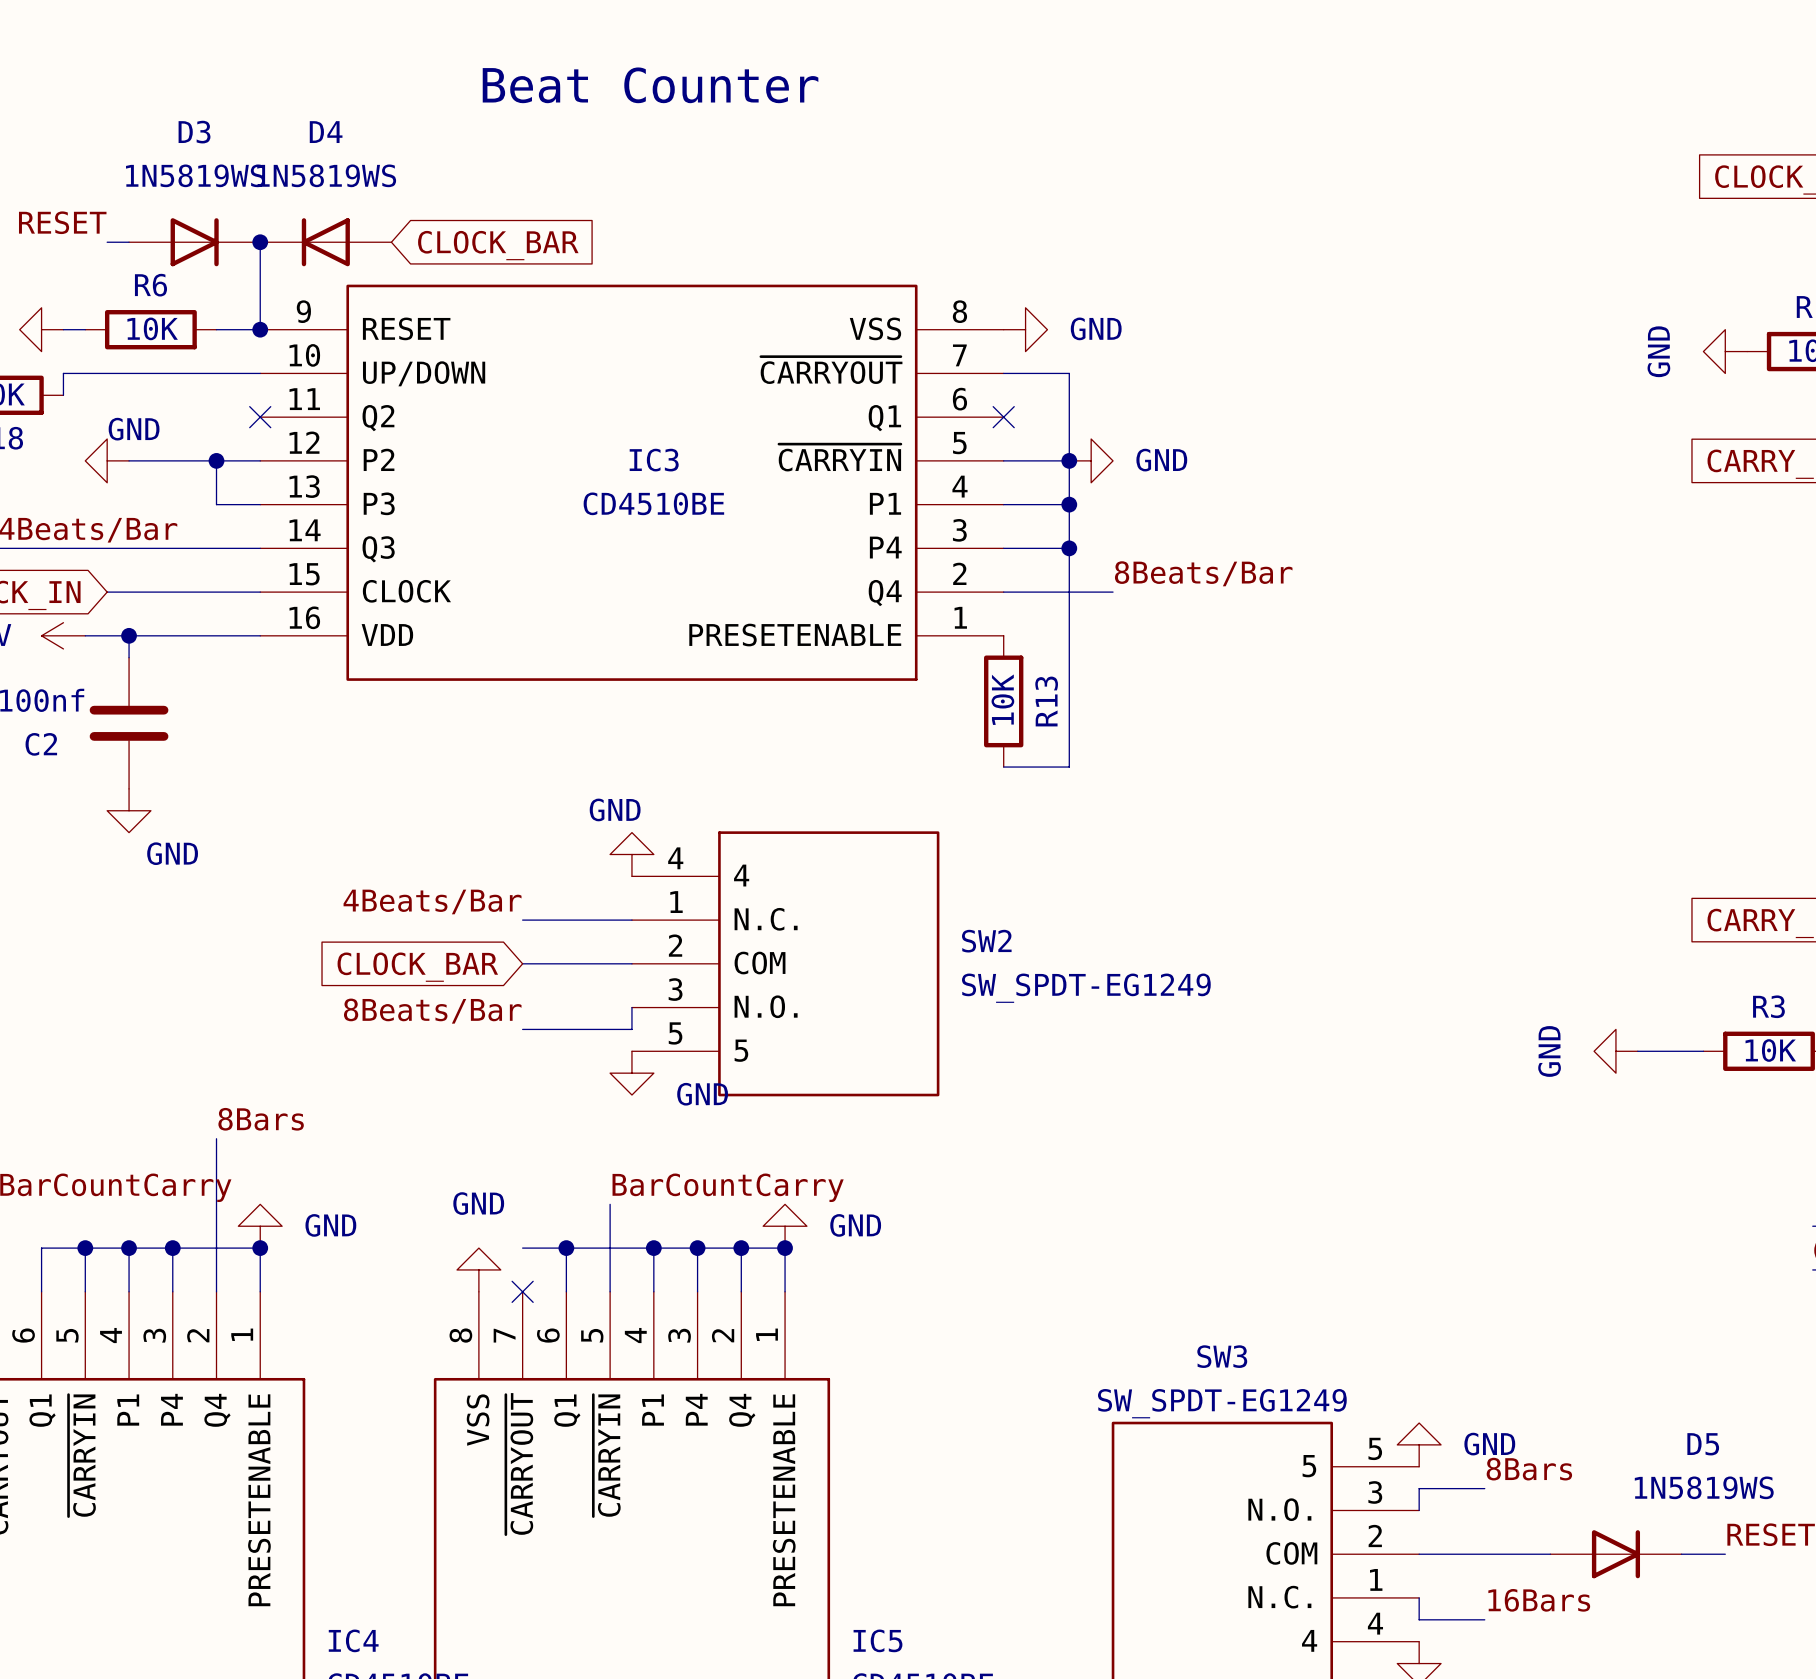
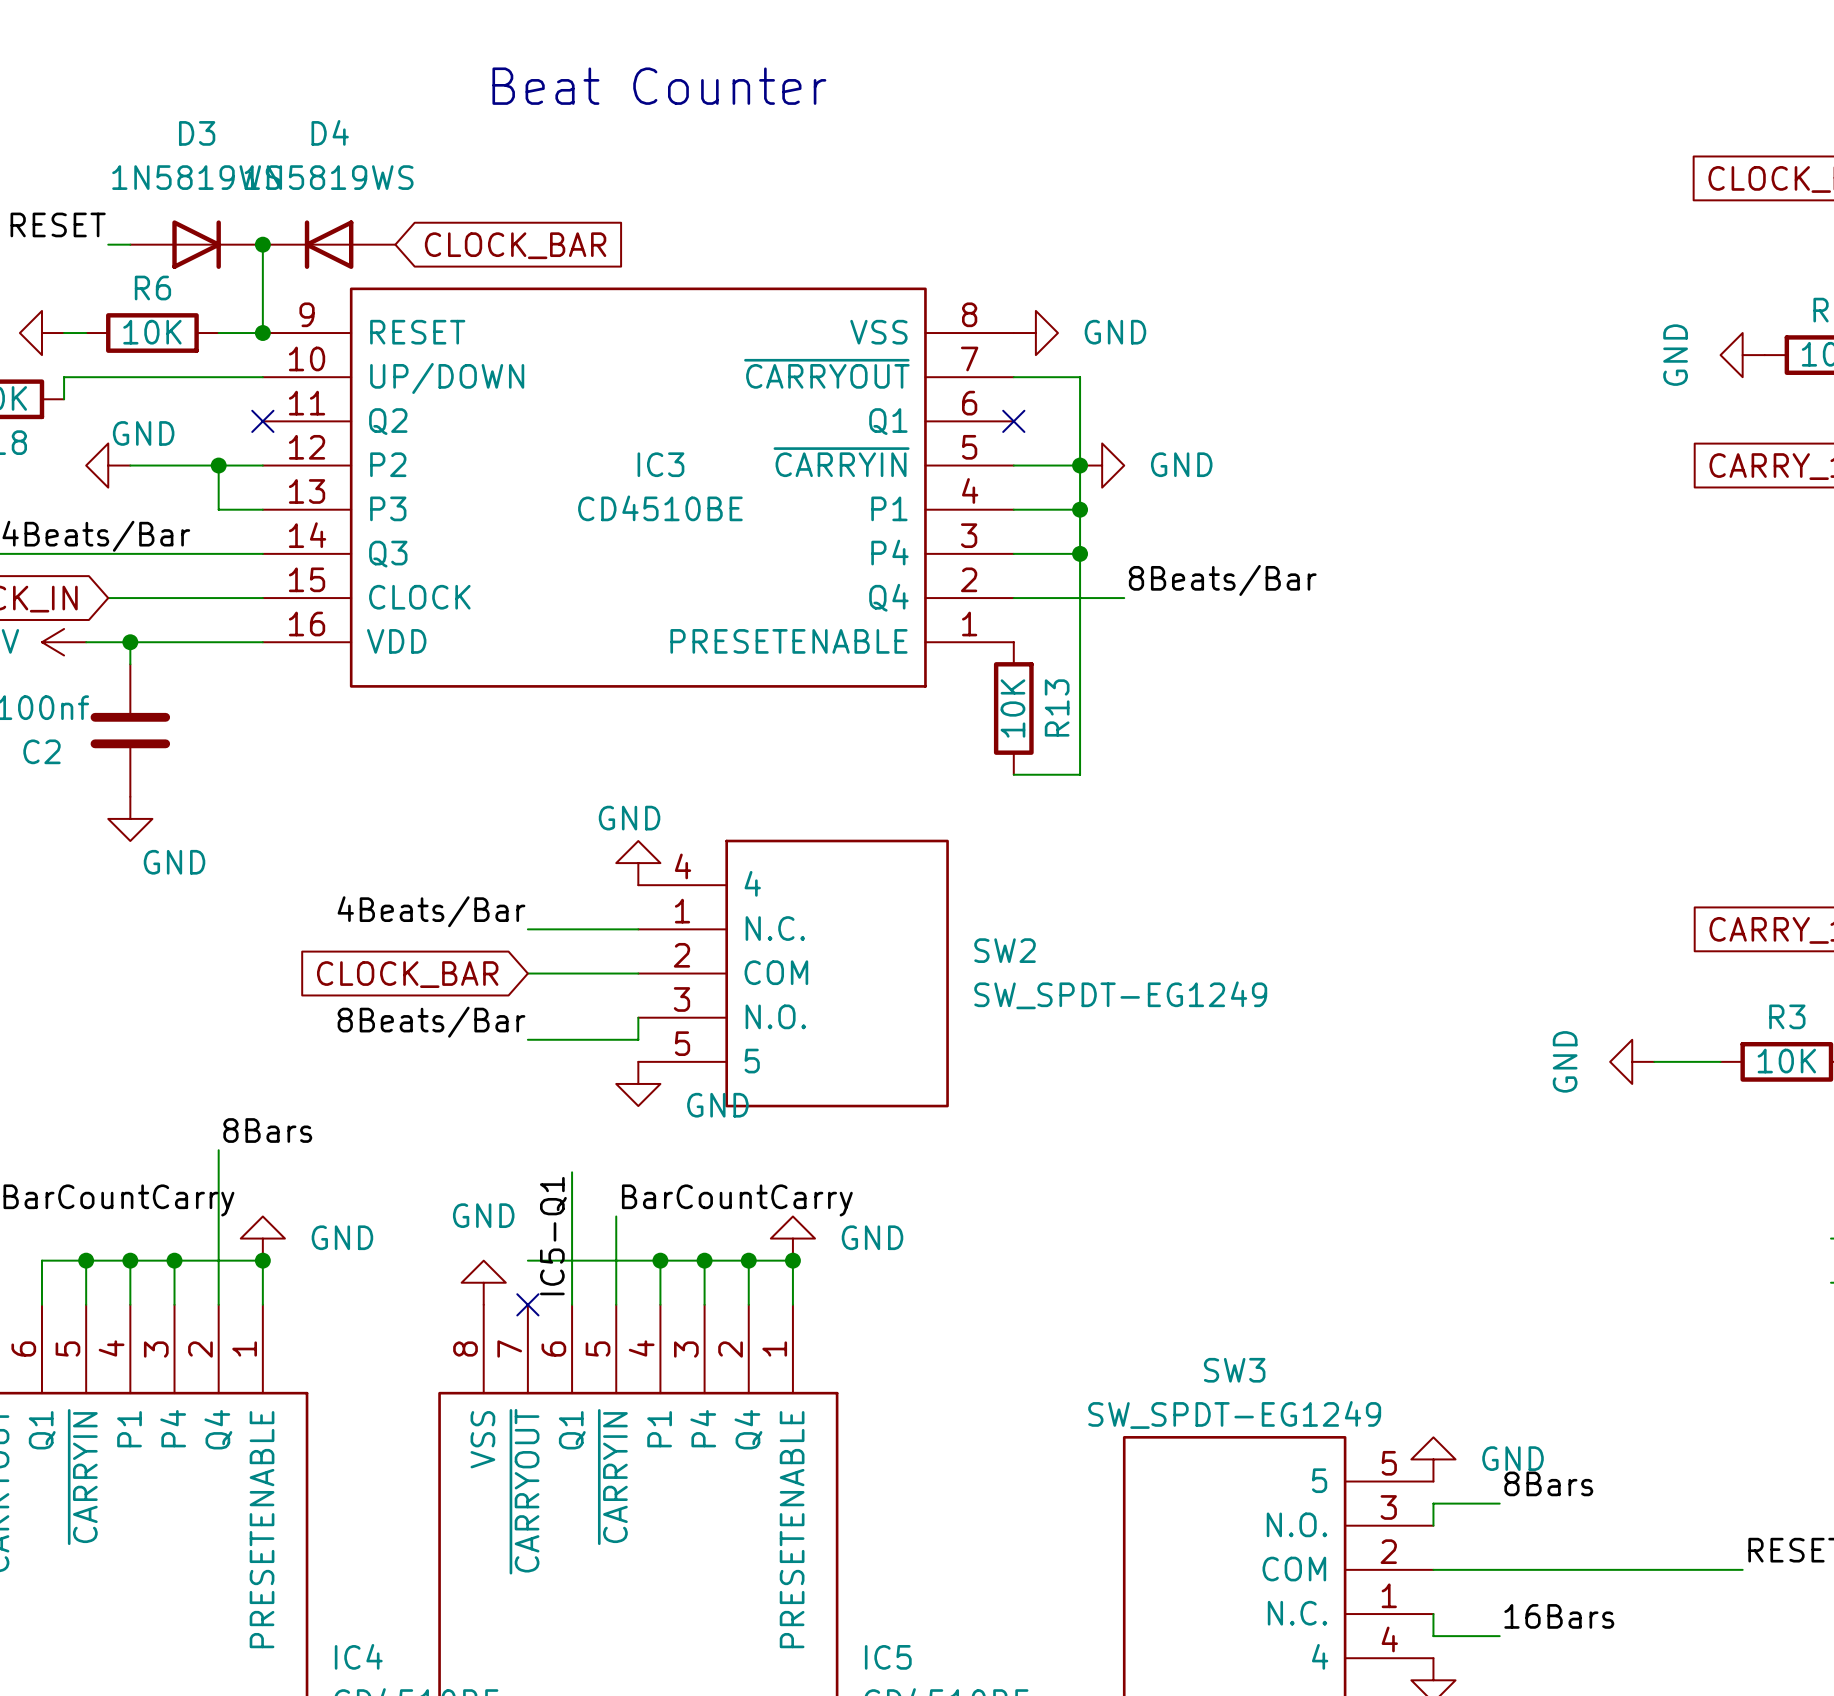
wire: none -> (572, 1172) (572, 1260)
label: none -> IC5-Q1 (553, 1236)
junction: (566, 1248) -> none
D5: 1N5819WS (1615, 1554) -> none

